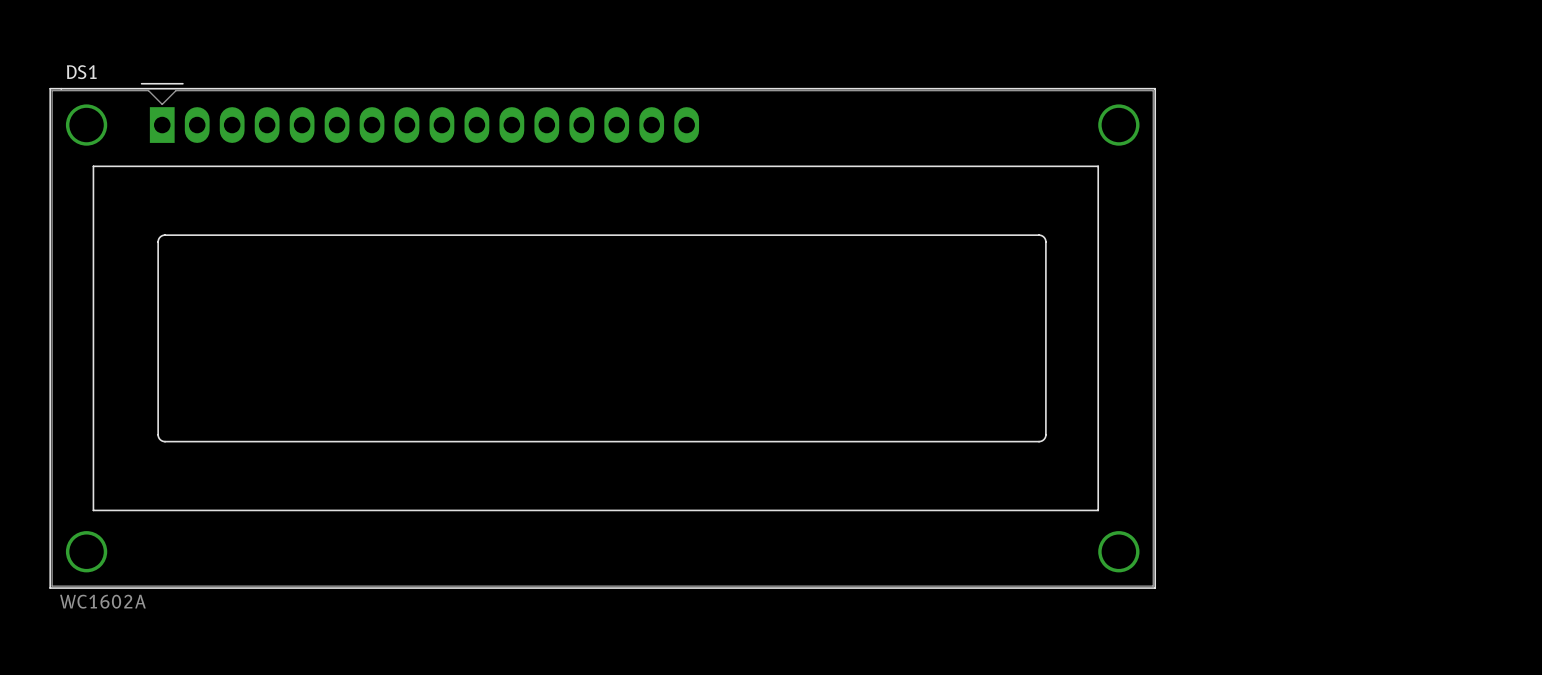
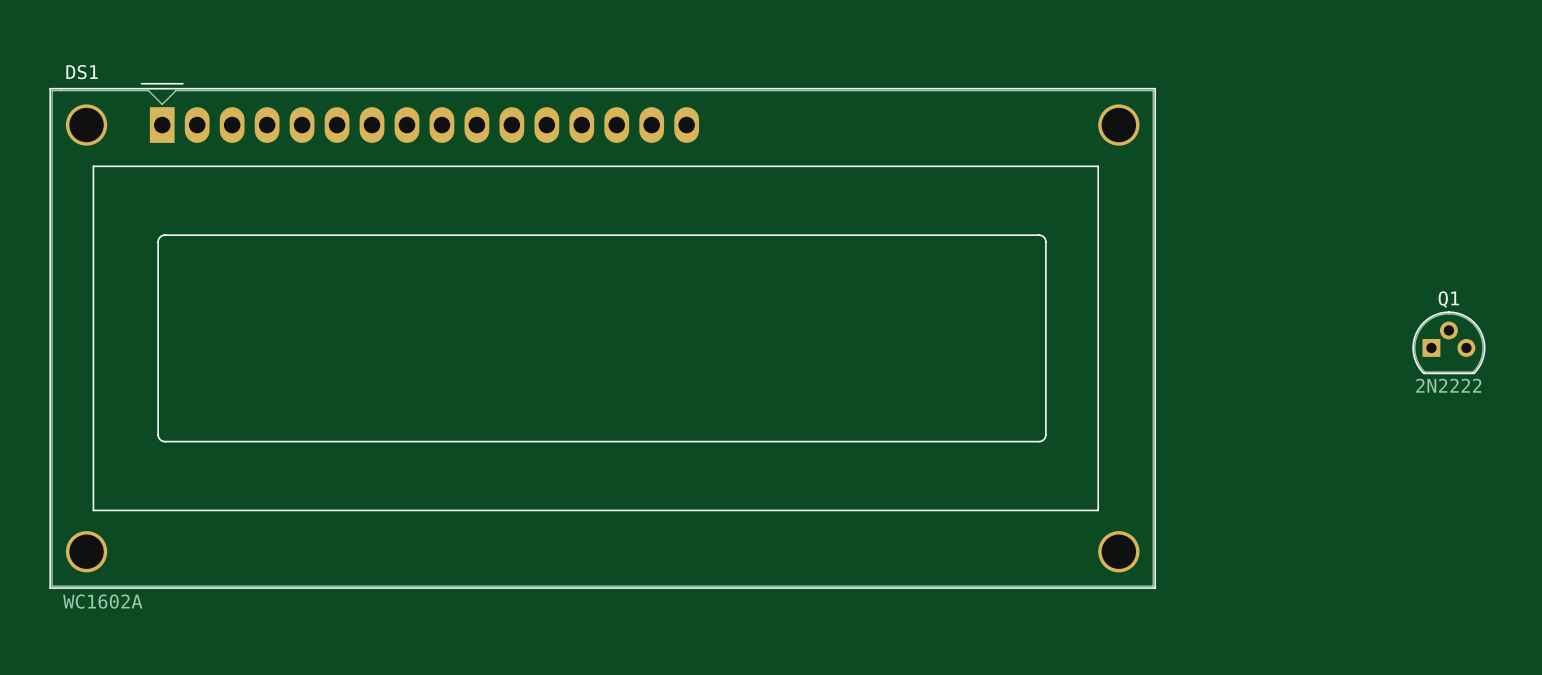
Q1: none -> 2N2222 (1448, 342)

